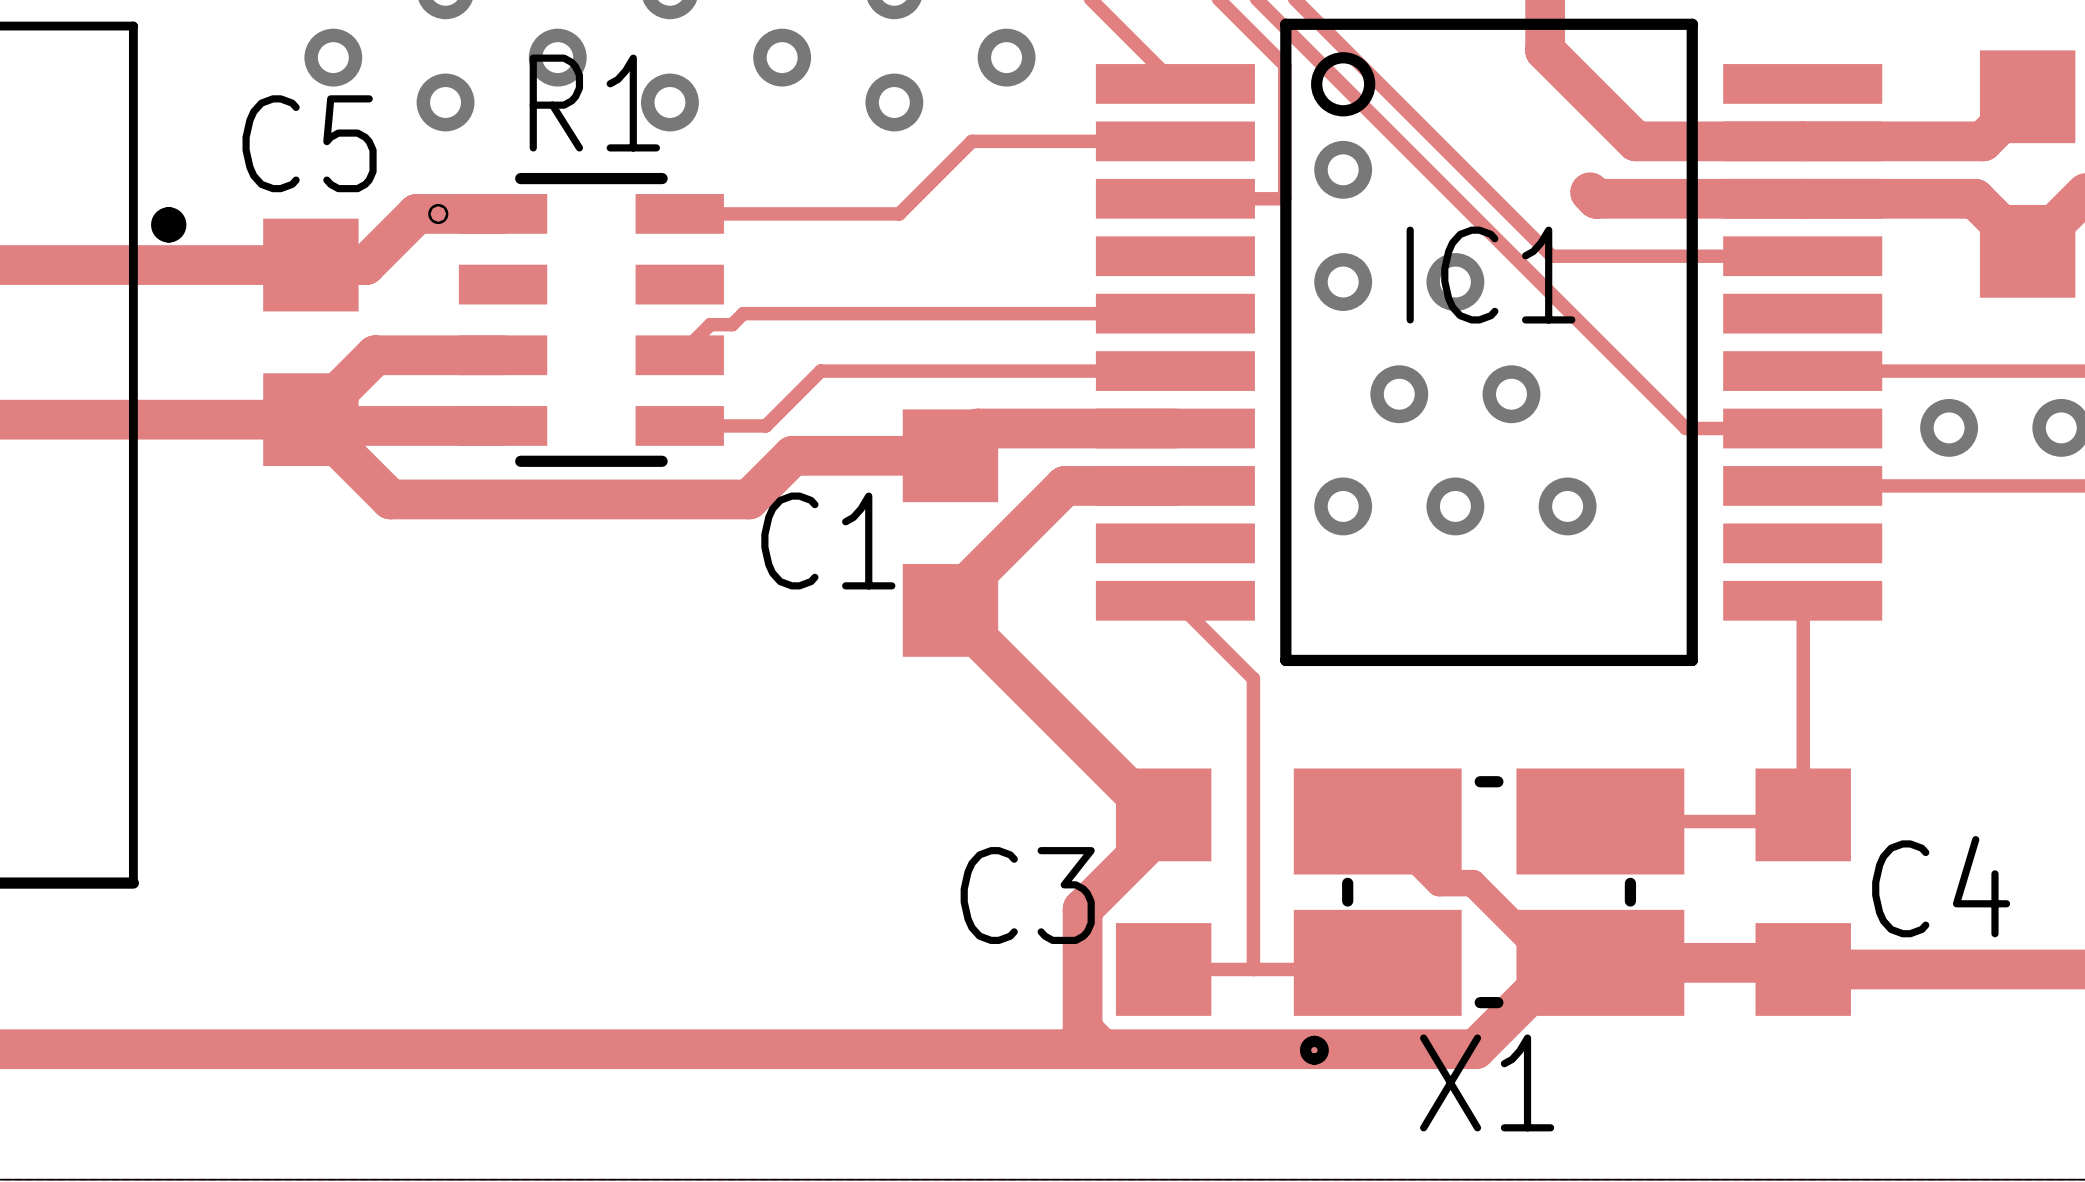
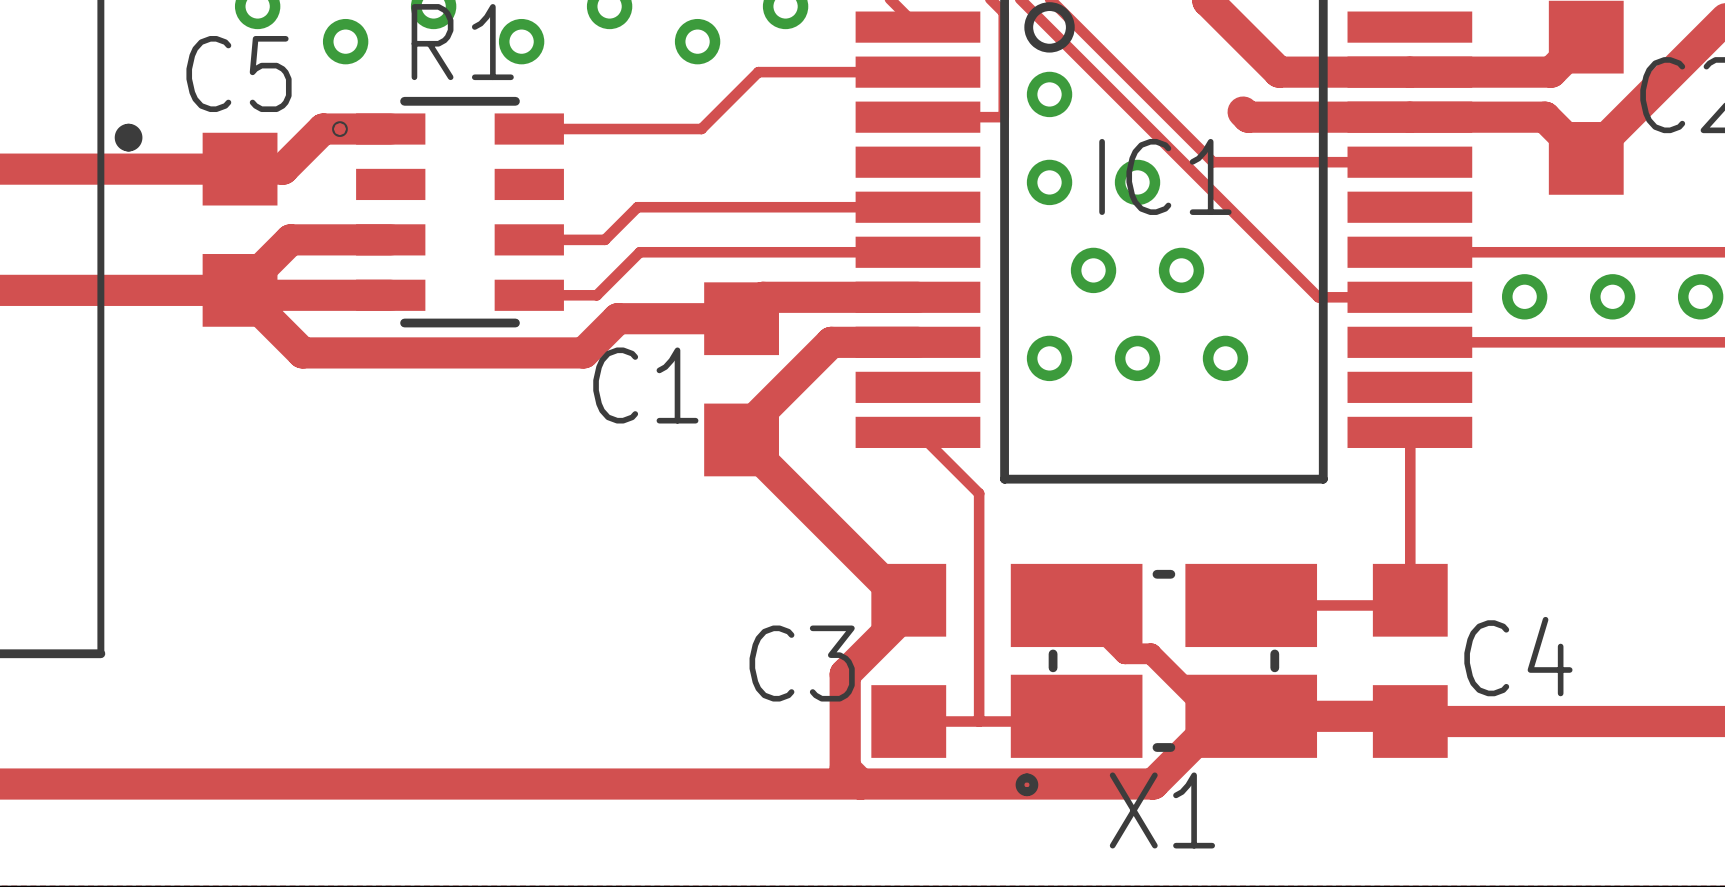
track: (817, 313) (743, 313) (732, 324) (710, 324) (679, 355) -> (637, 207) (604, 239) (529, 239)

